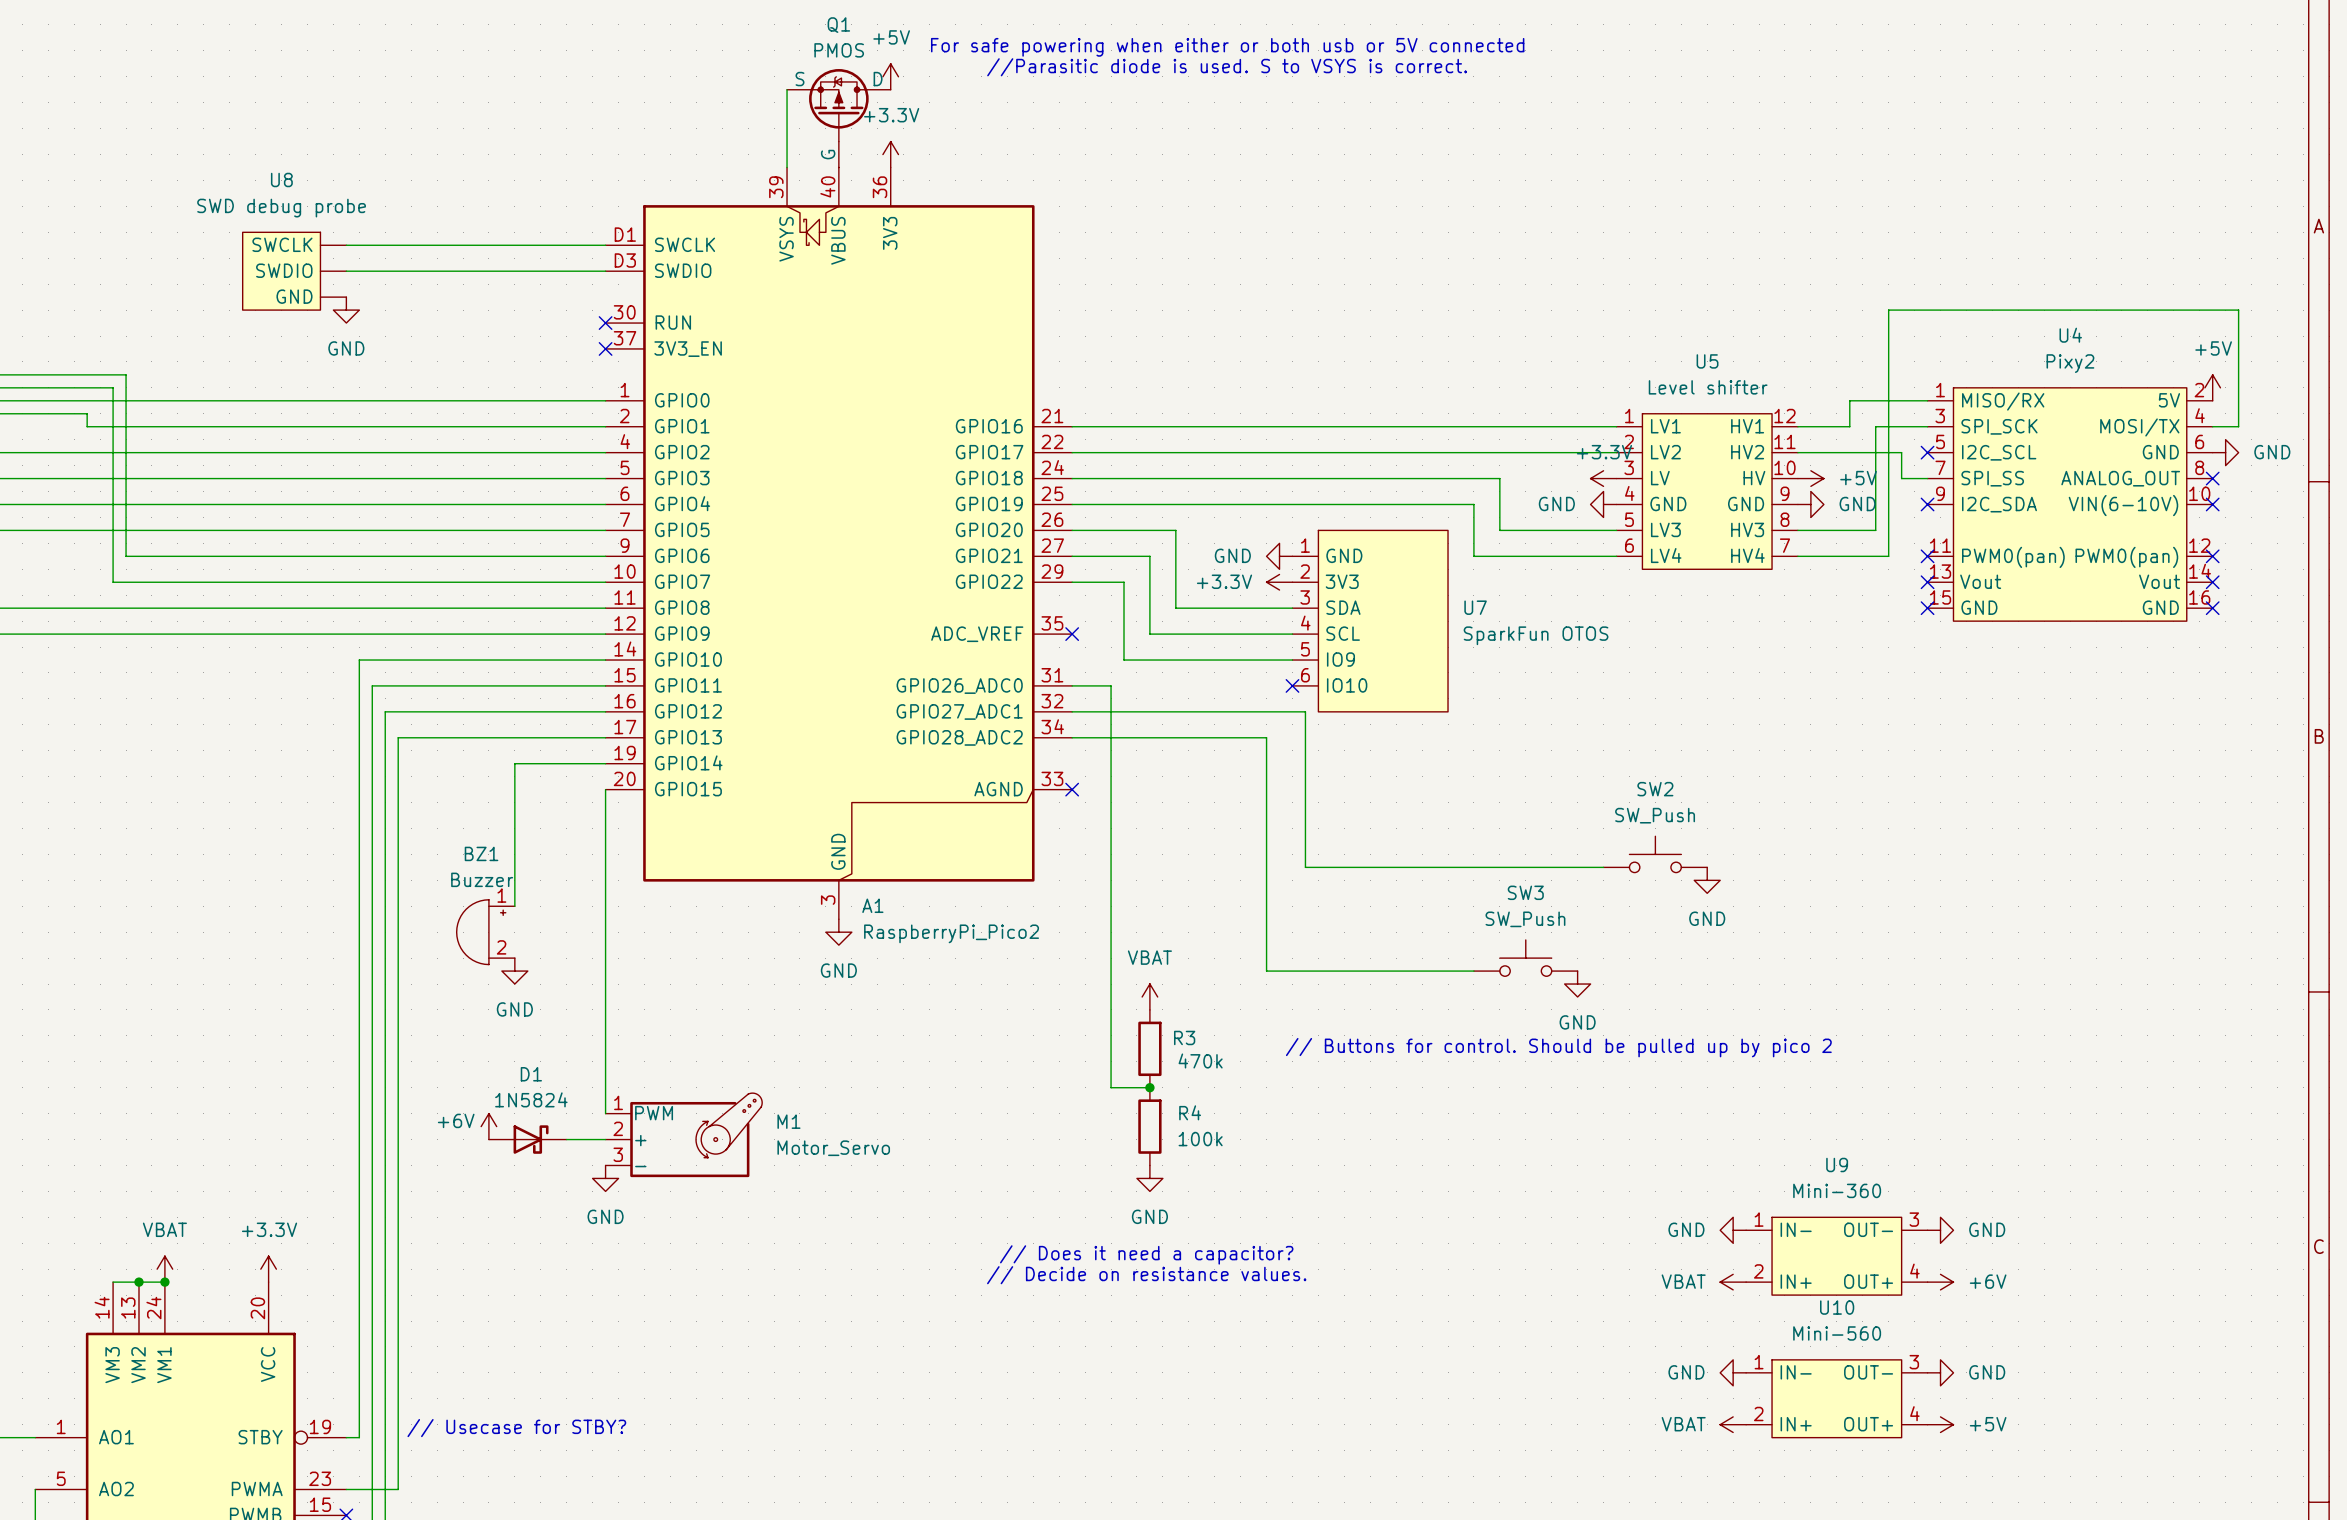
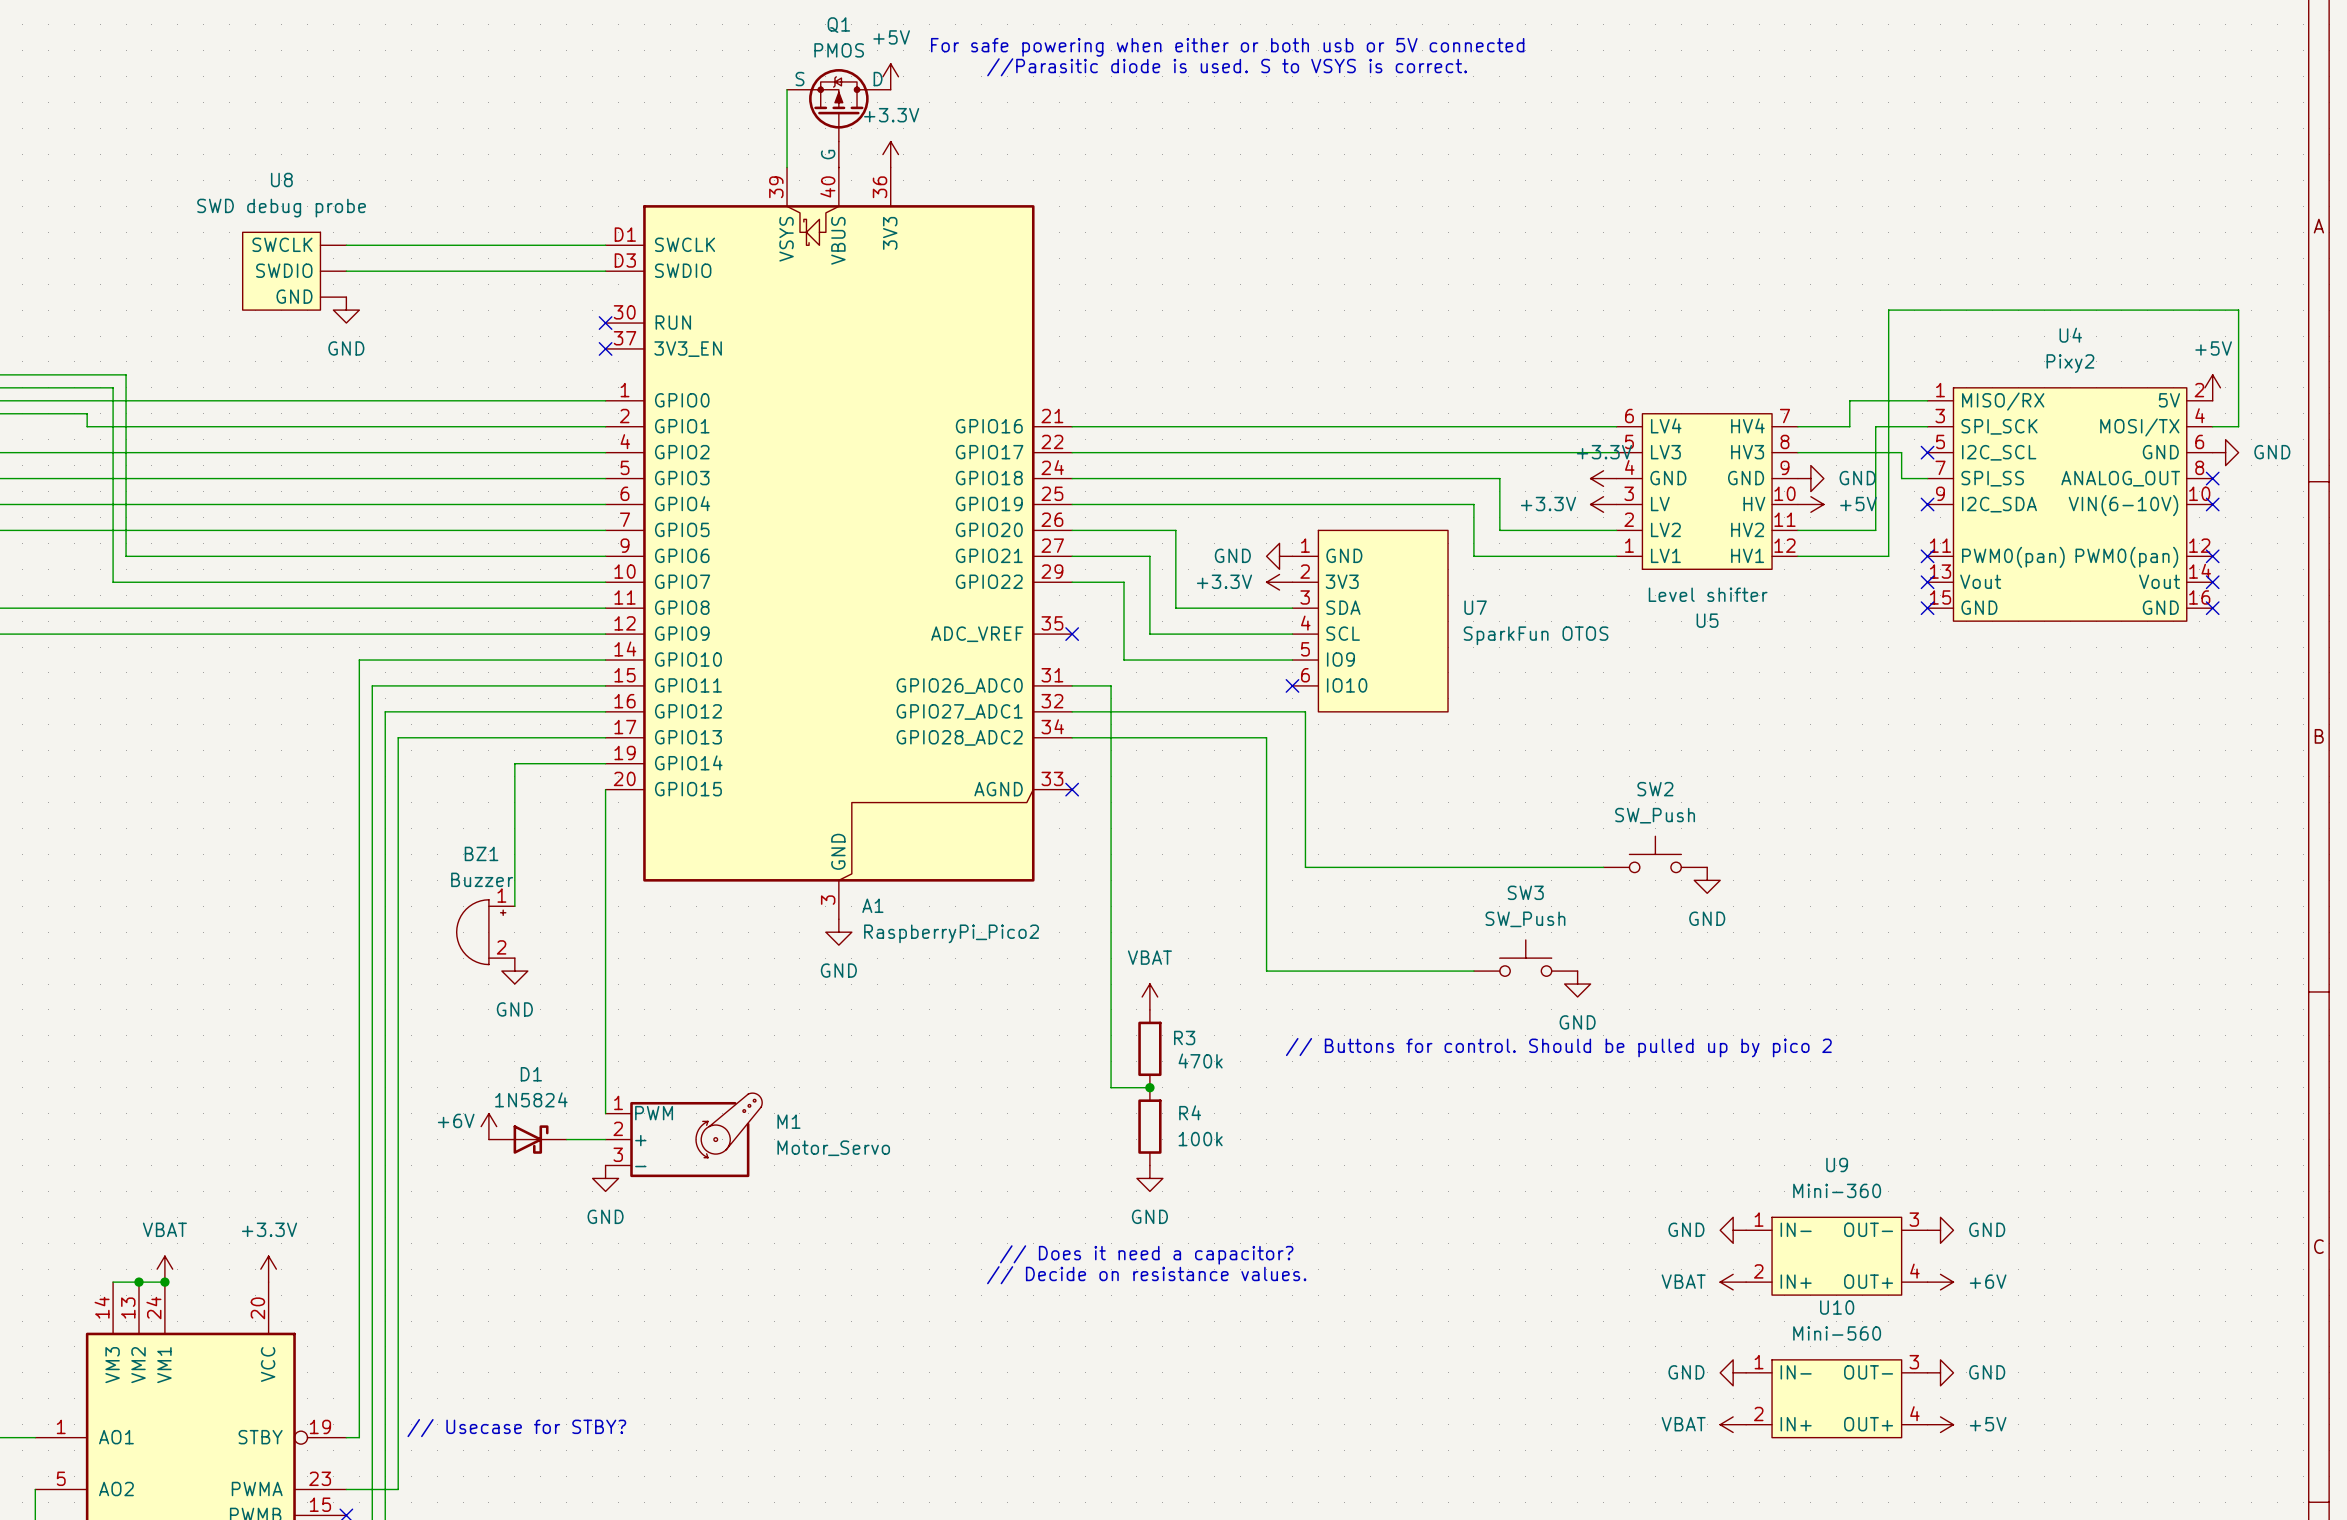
power symbol: +5V (1810, 478) -> GND (1810, 478)
U5 flip: as is (1707, 491) -> up-down (1707, 491)
power symbol: GND (1603, 504) -> +3.3V (1603, 504)
power symbol: GND (1810, 504) -> +5V (1810, 504)

